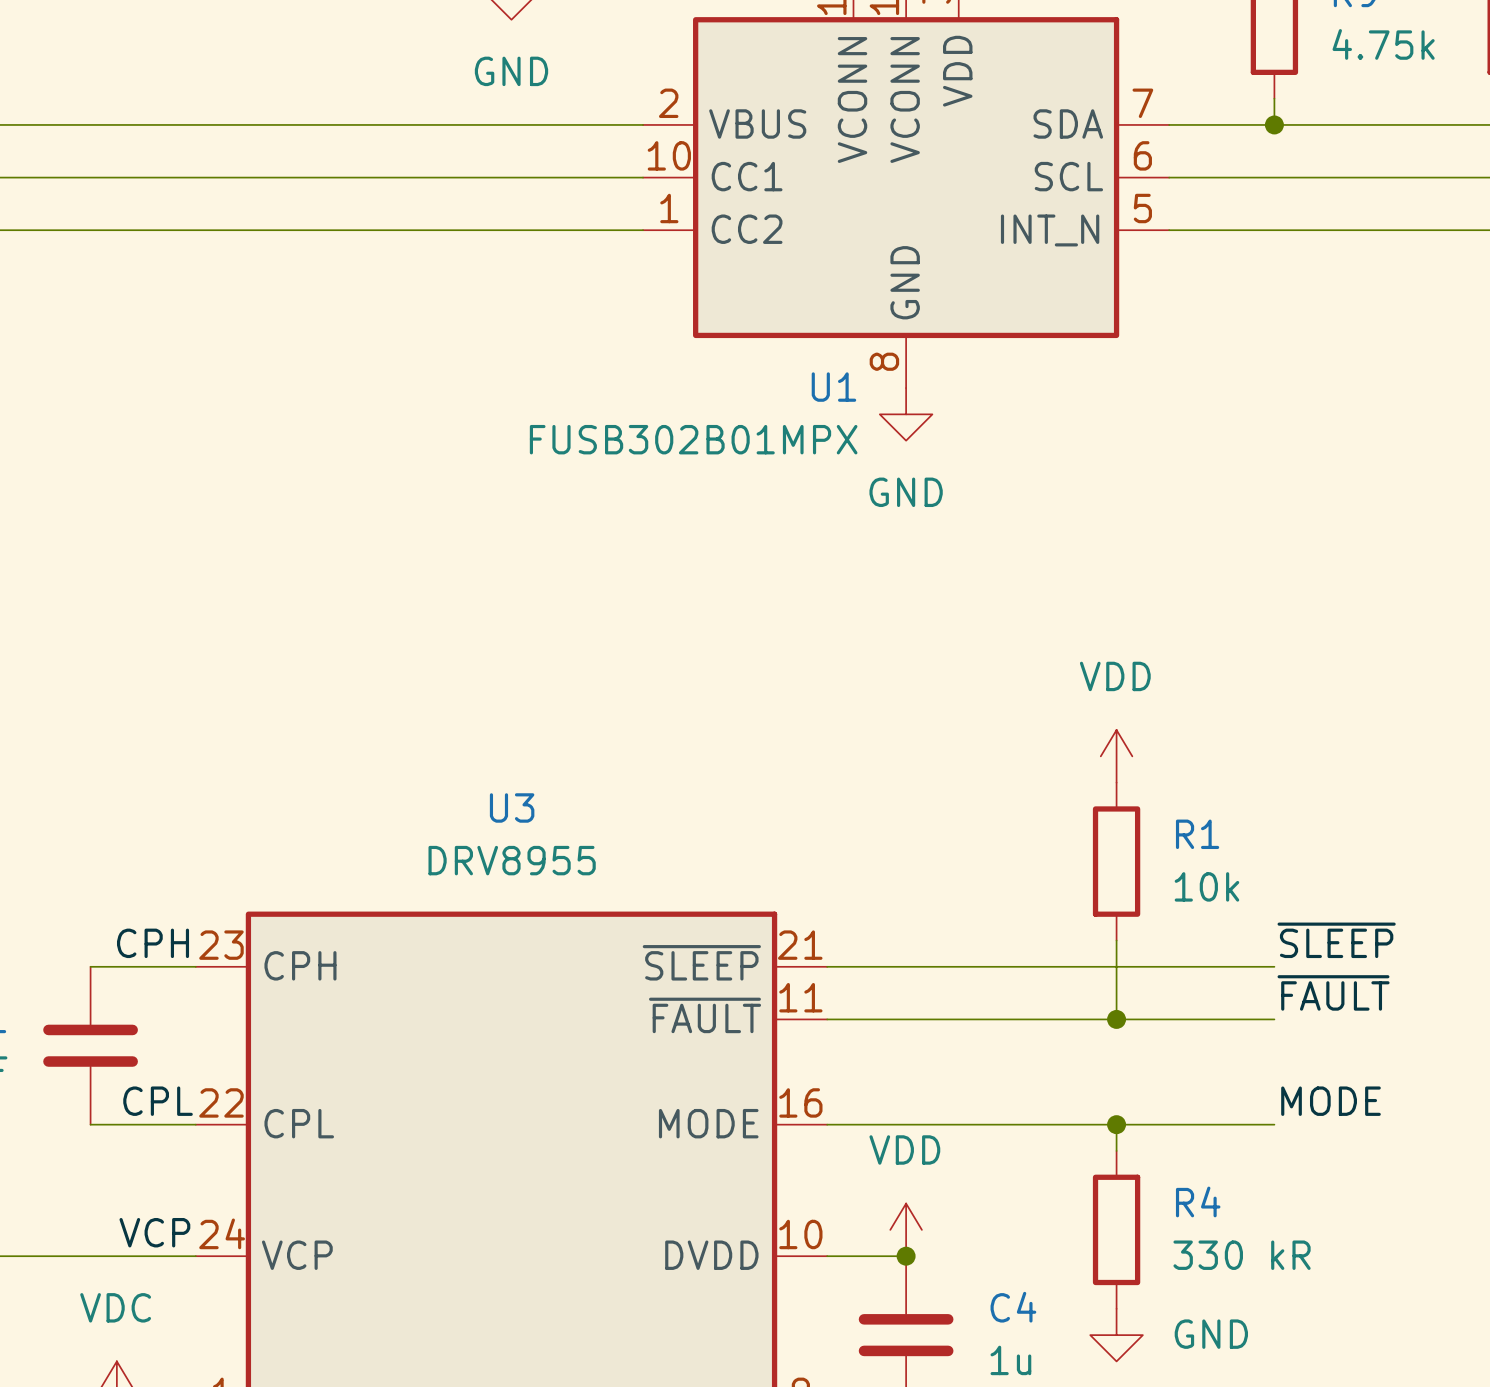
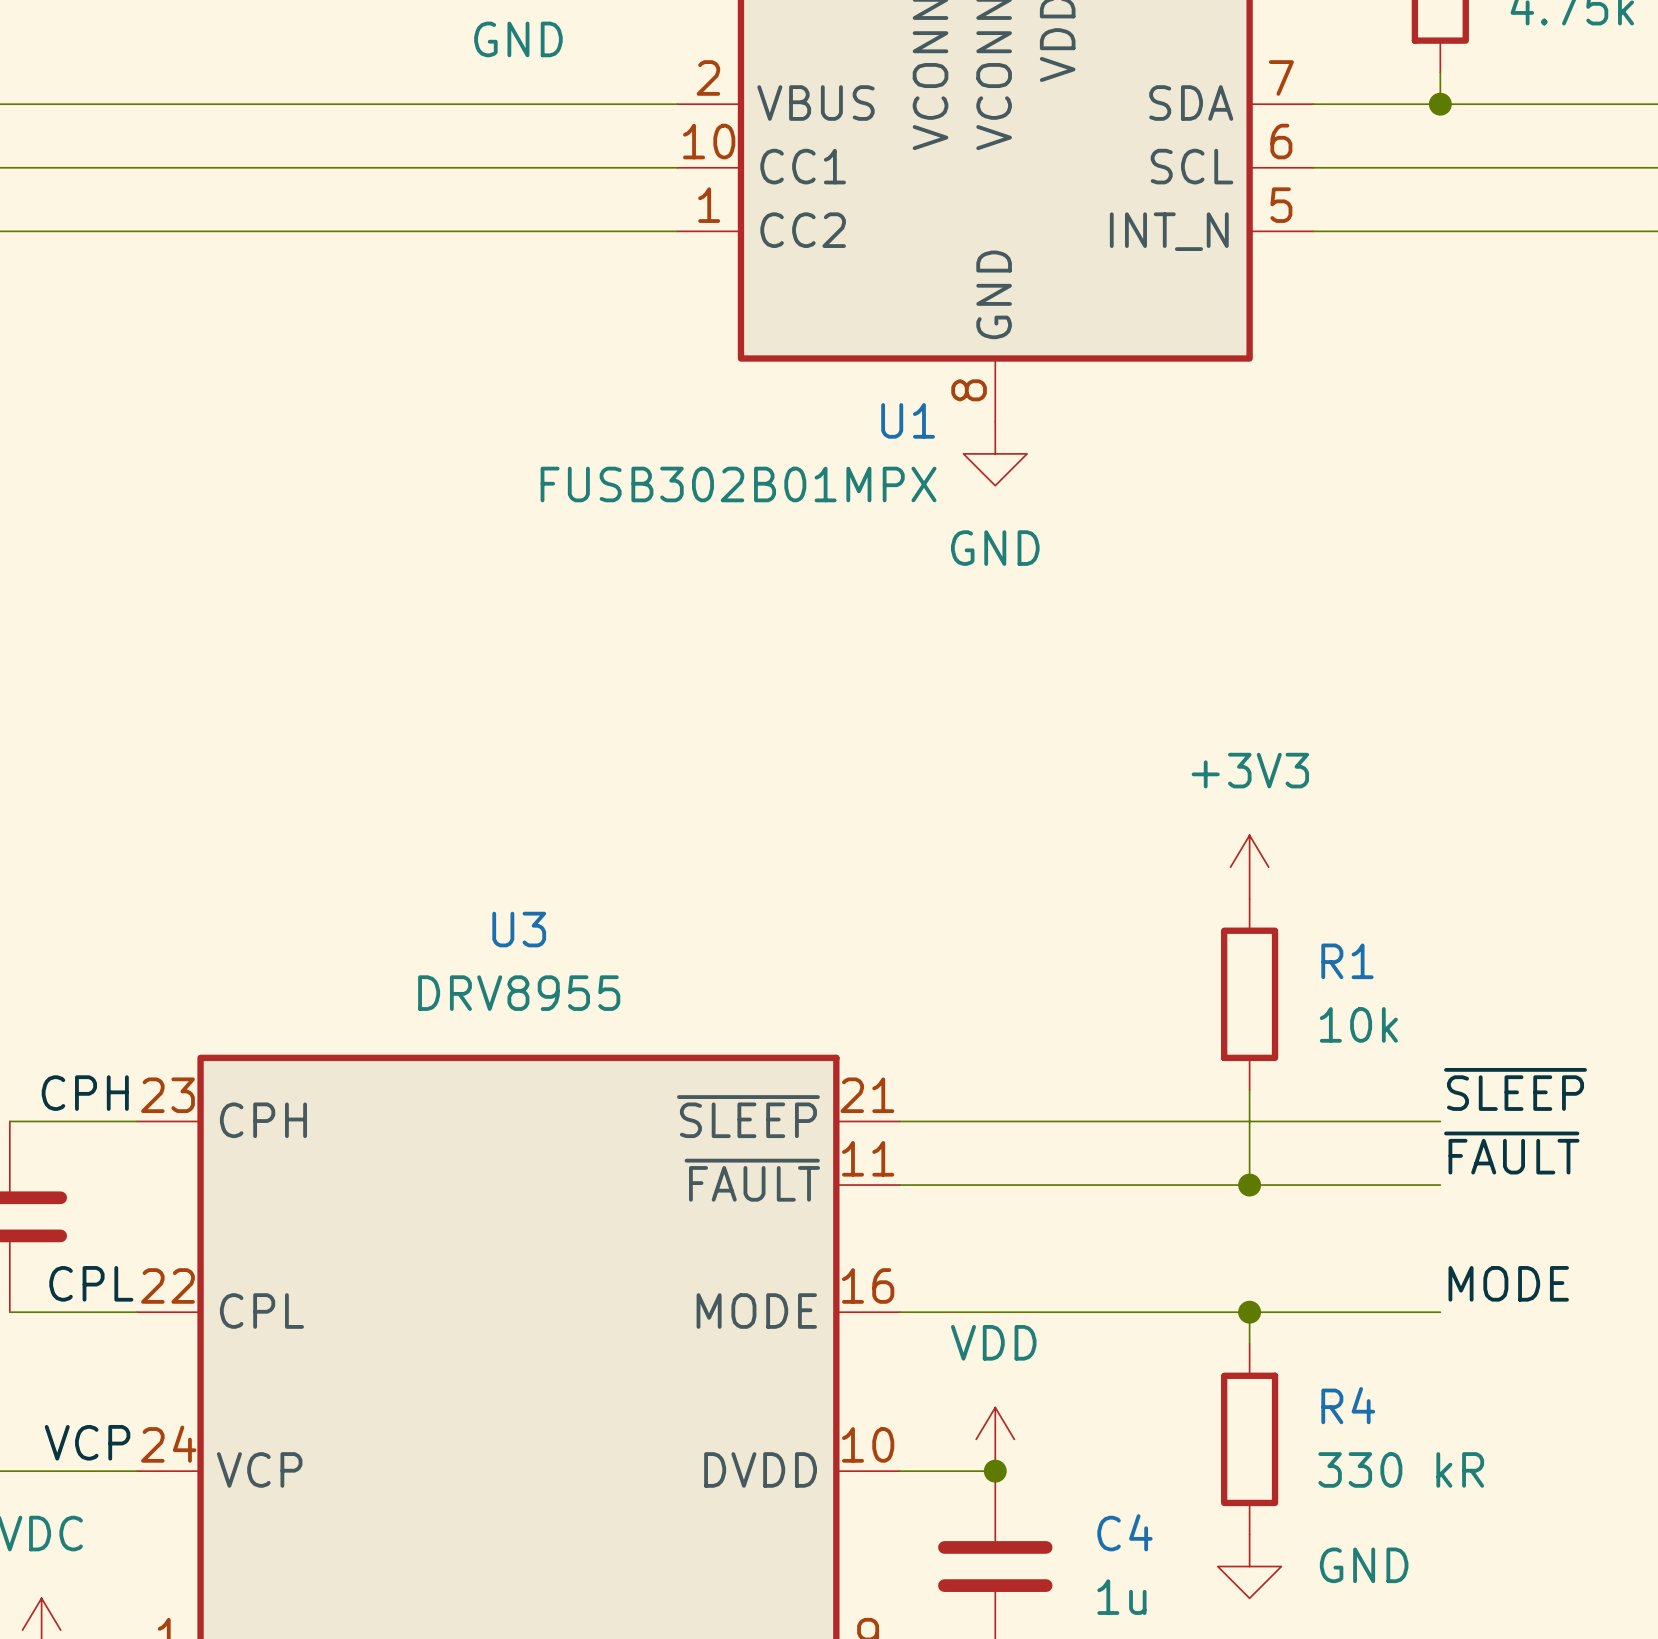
power symbol: VDD (1116, 756) -> +3V3 (1249, 867)

